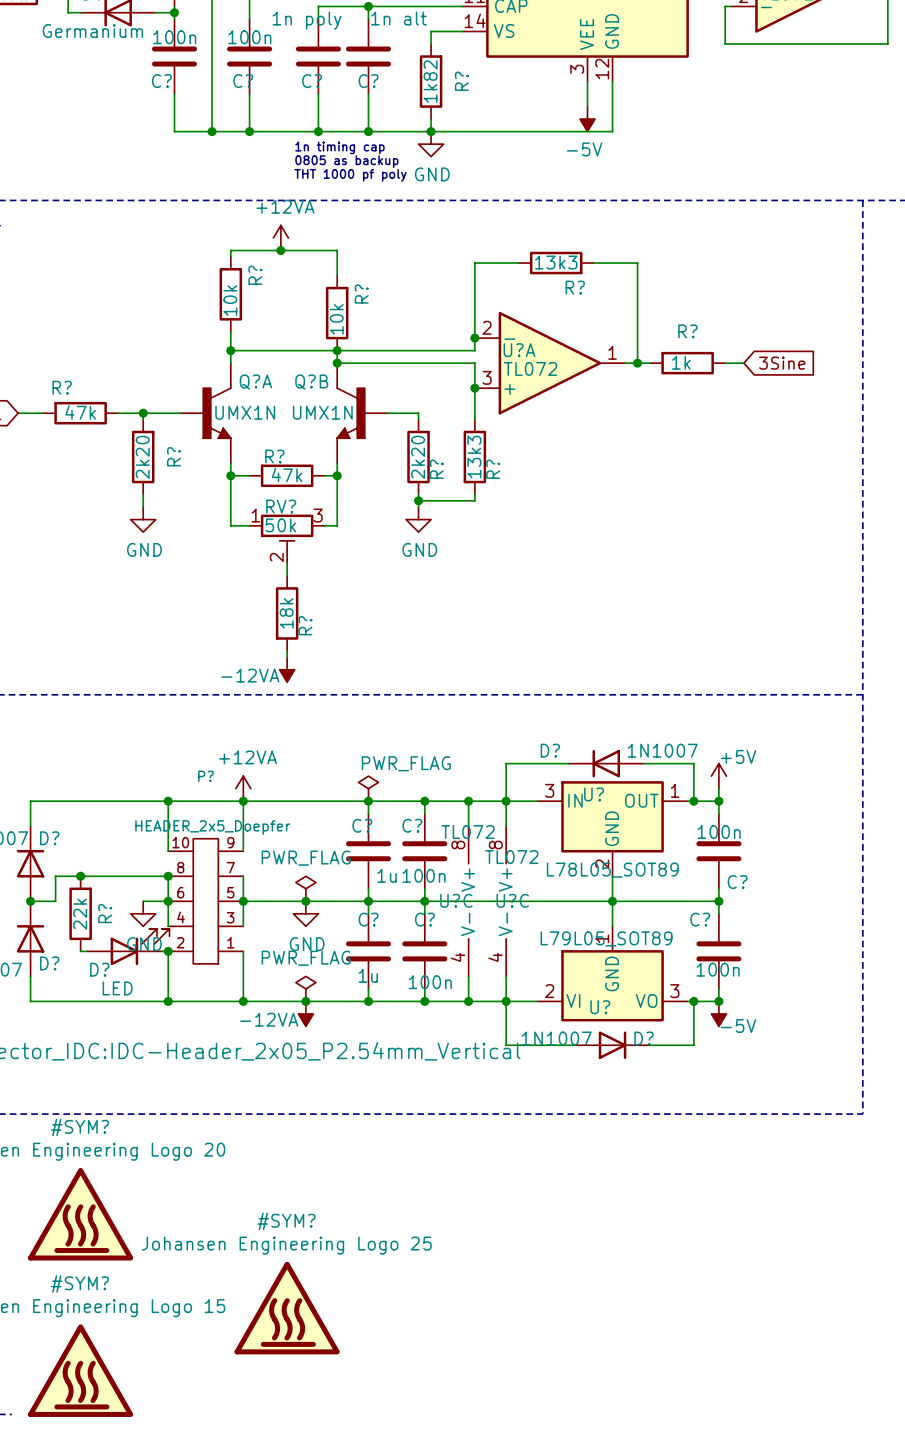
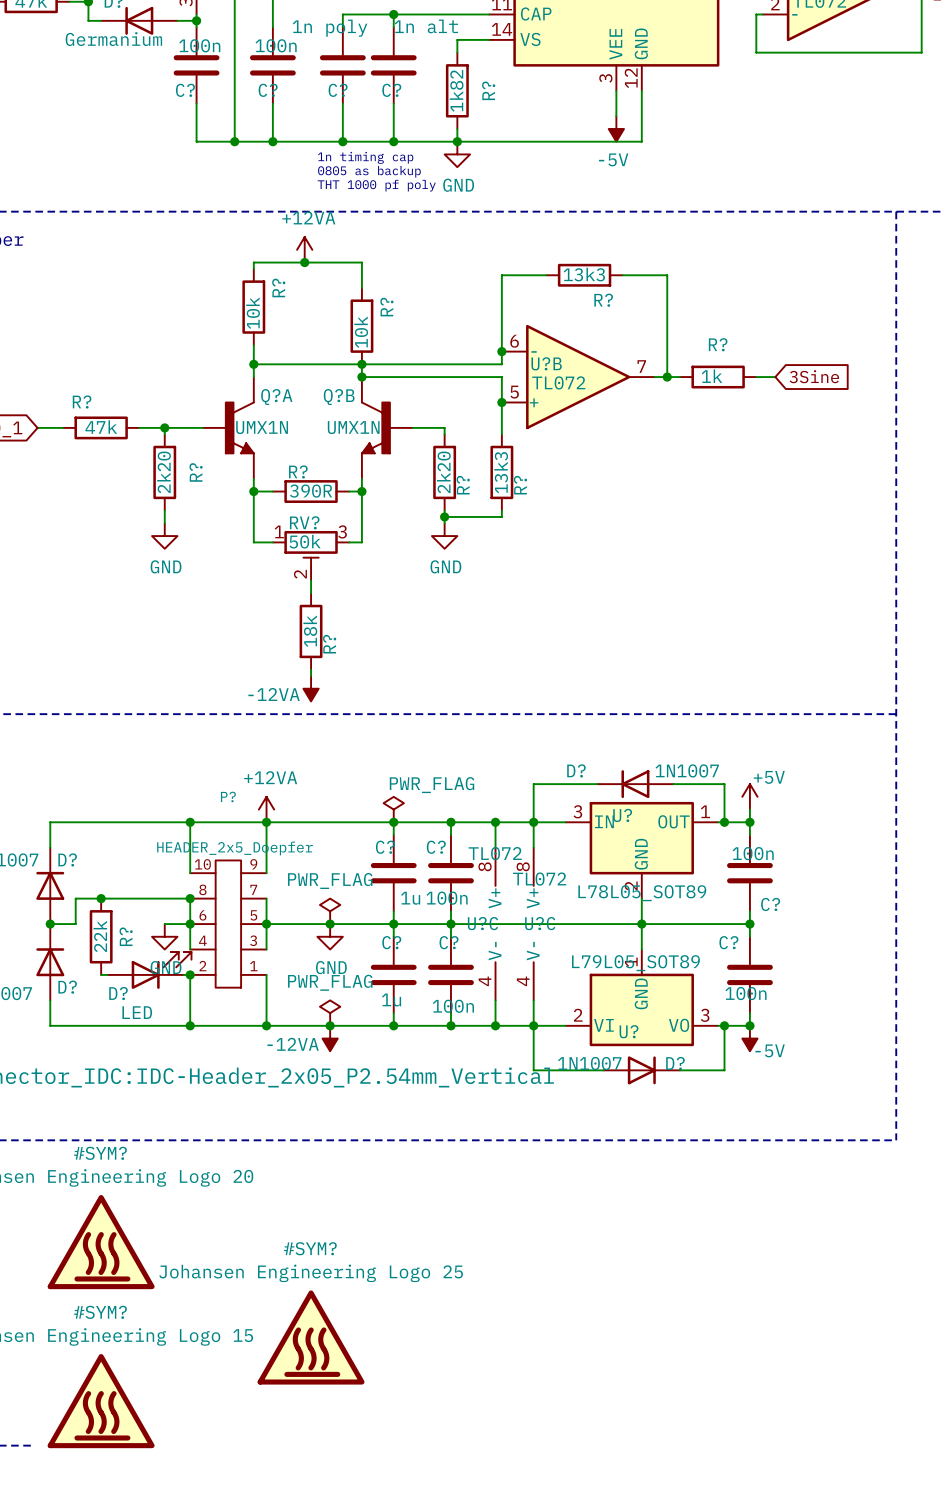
U?A pin number: 2 (487, 327) -> 6 (514, 341)
U?A name: U?A (519, 350) -> U?B (546, 363)
U?A pin number: 1 (612, 352) -> 7 (641, 366)
U?A pin number: 3 (487, 377) -> 5 (514, 392)
R? value: 47k (287, 475) -> 390R (311, 491)

